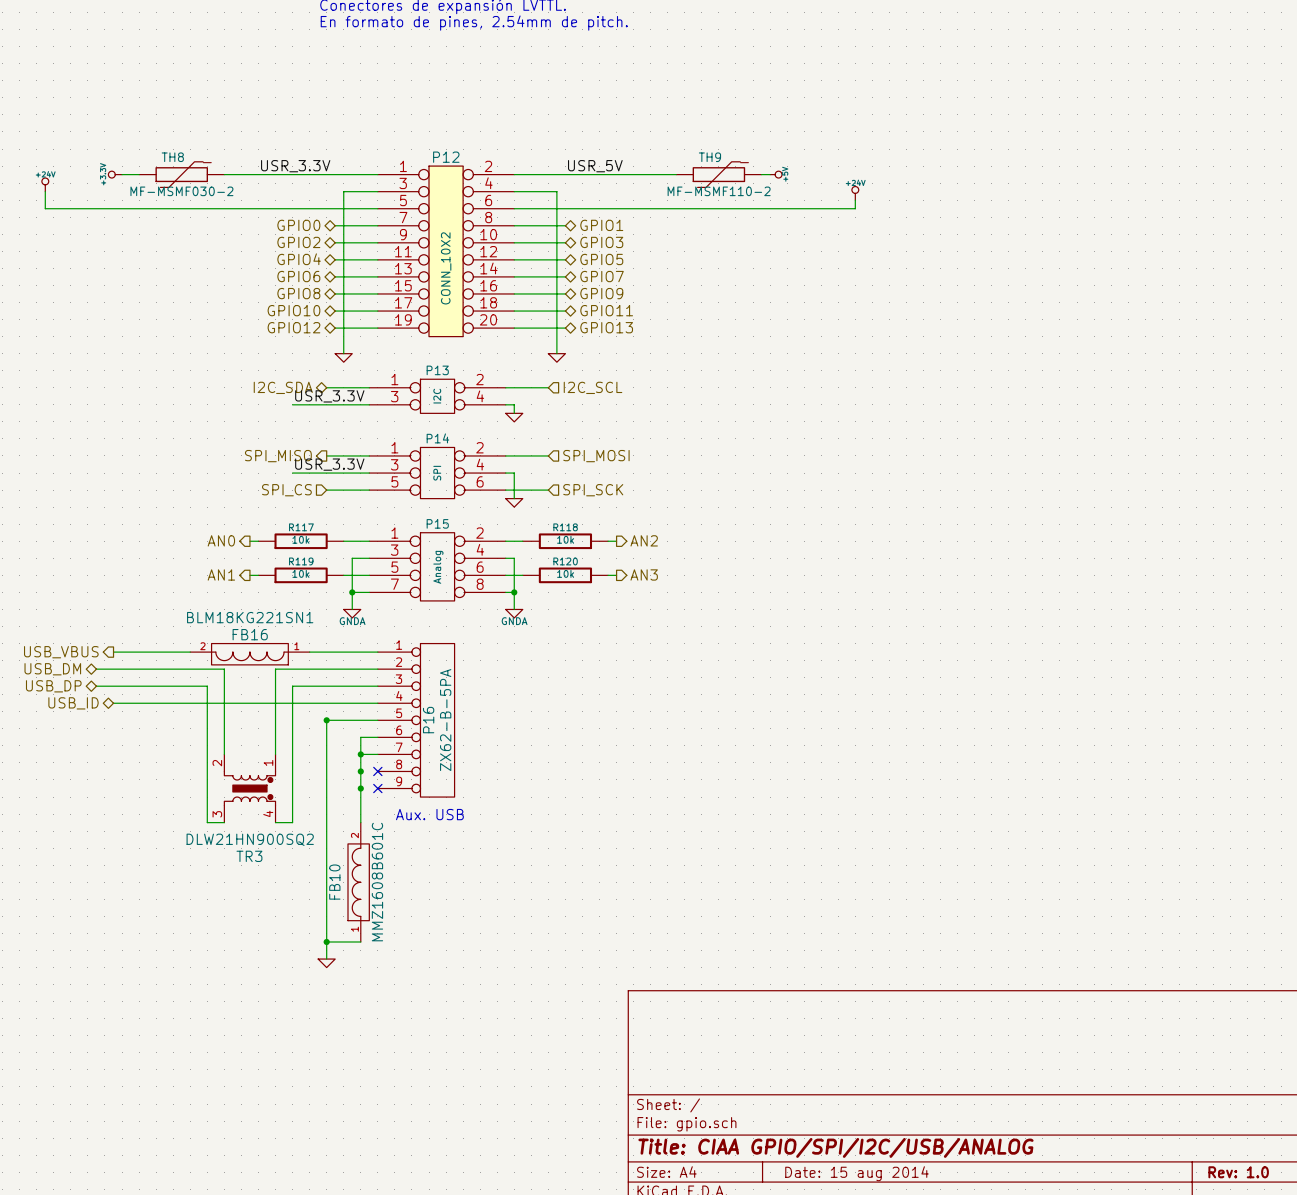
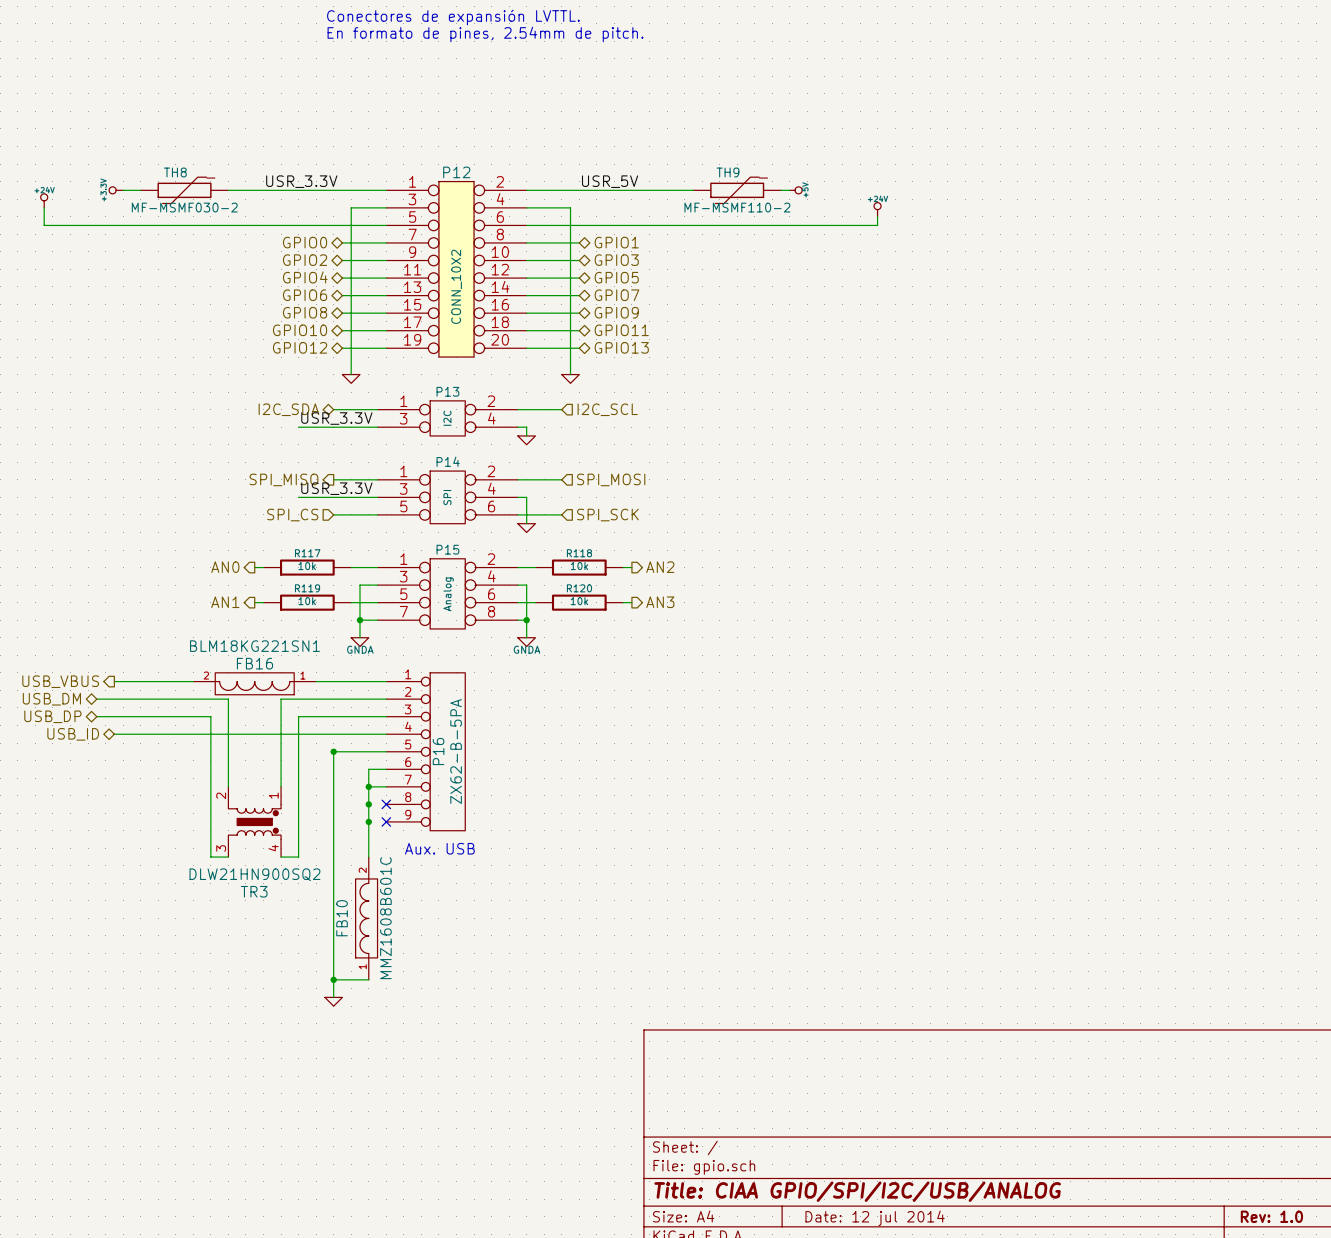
title block: Date: 15 aug 2014 (856, 1173) -> Date: 12 jul 2014 (875, 1218)

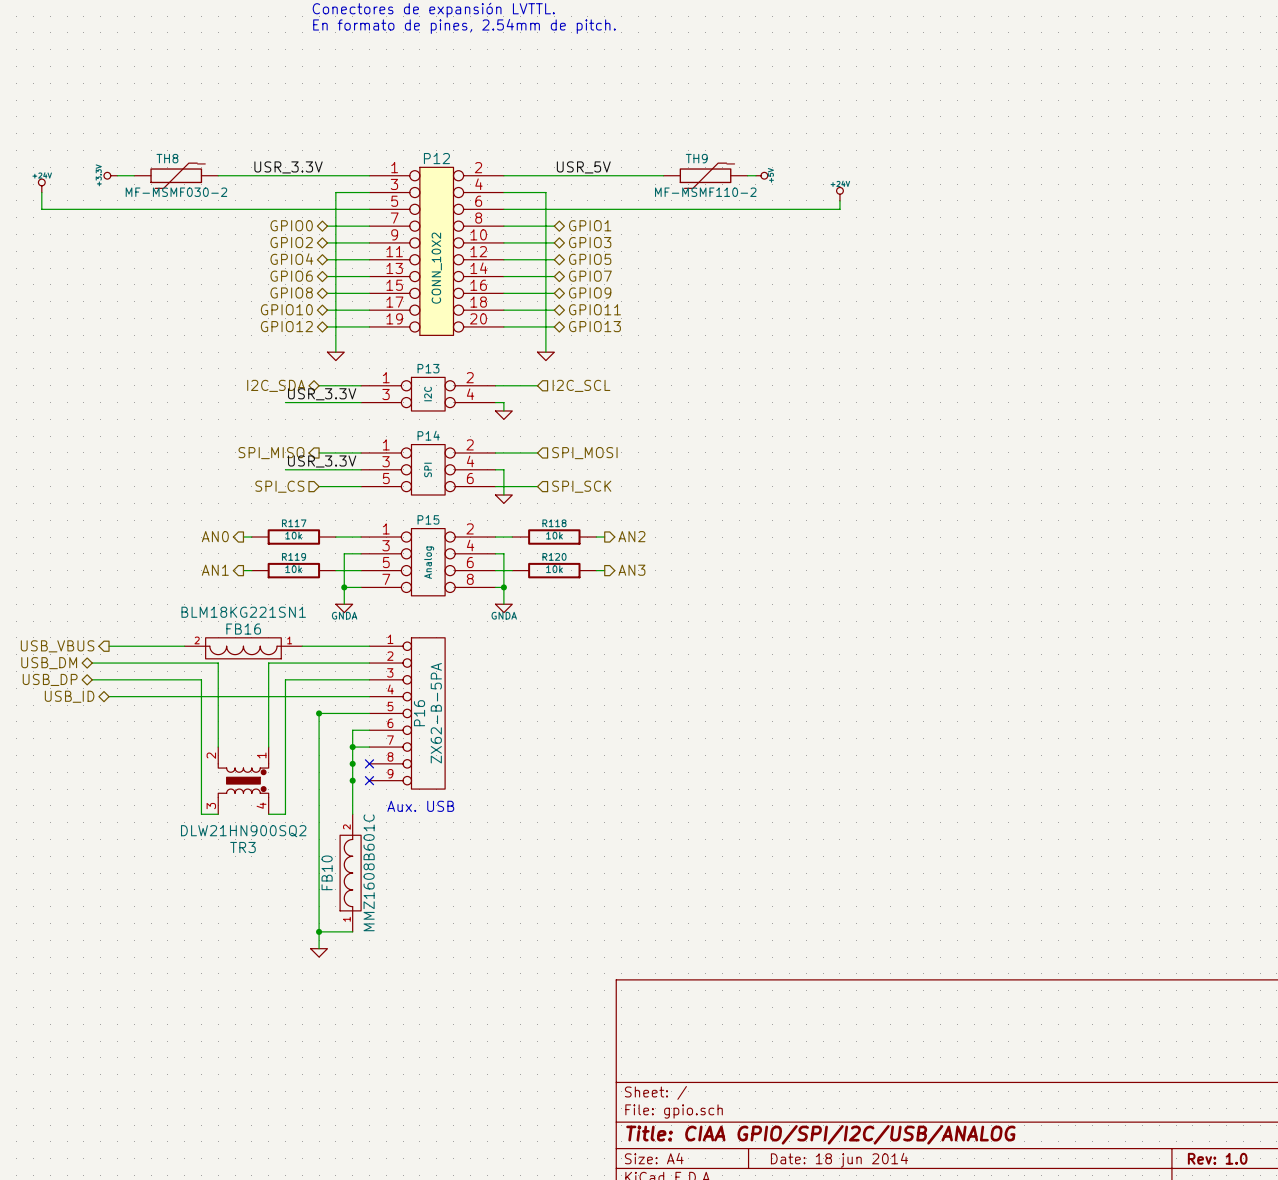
title block: Date: 12 jul 2014 (875, 1218) -> Date: 18 jun 2014 (839, 1160)

